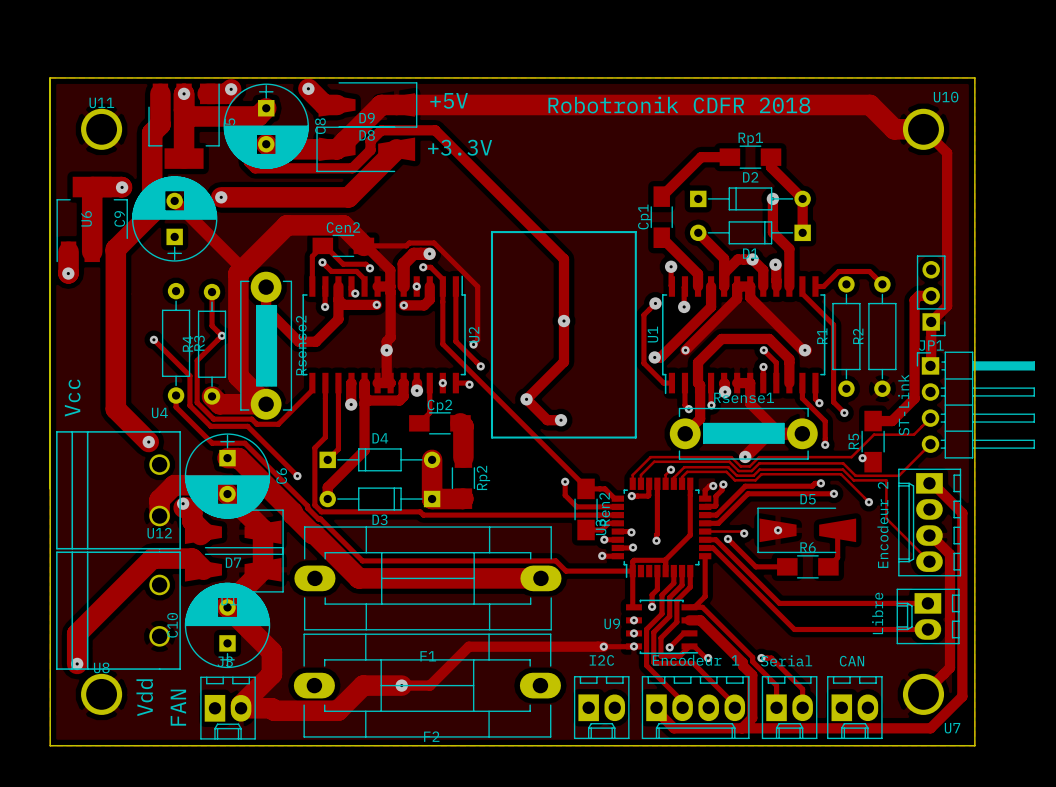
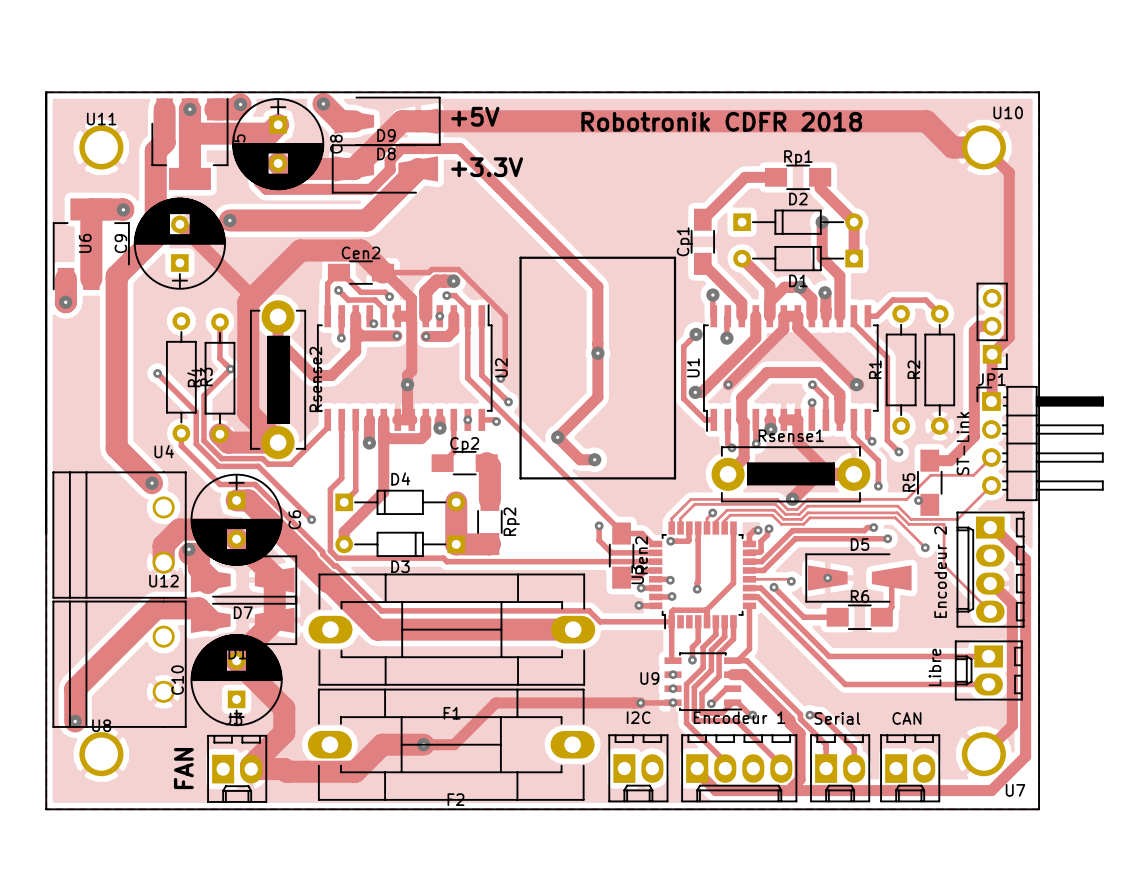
text: Vcc (72, 398) -> none
text: Vdd (144, 697) -> none

